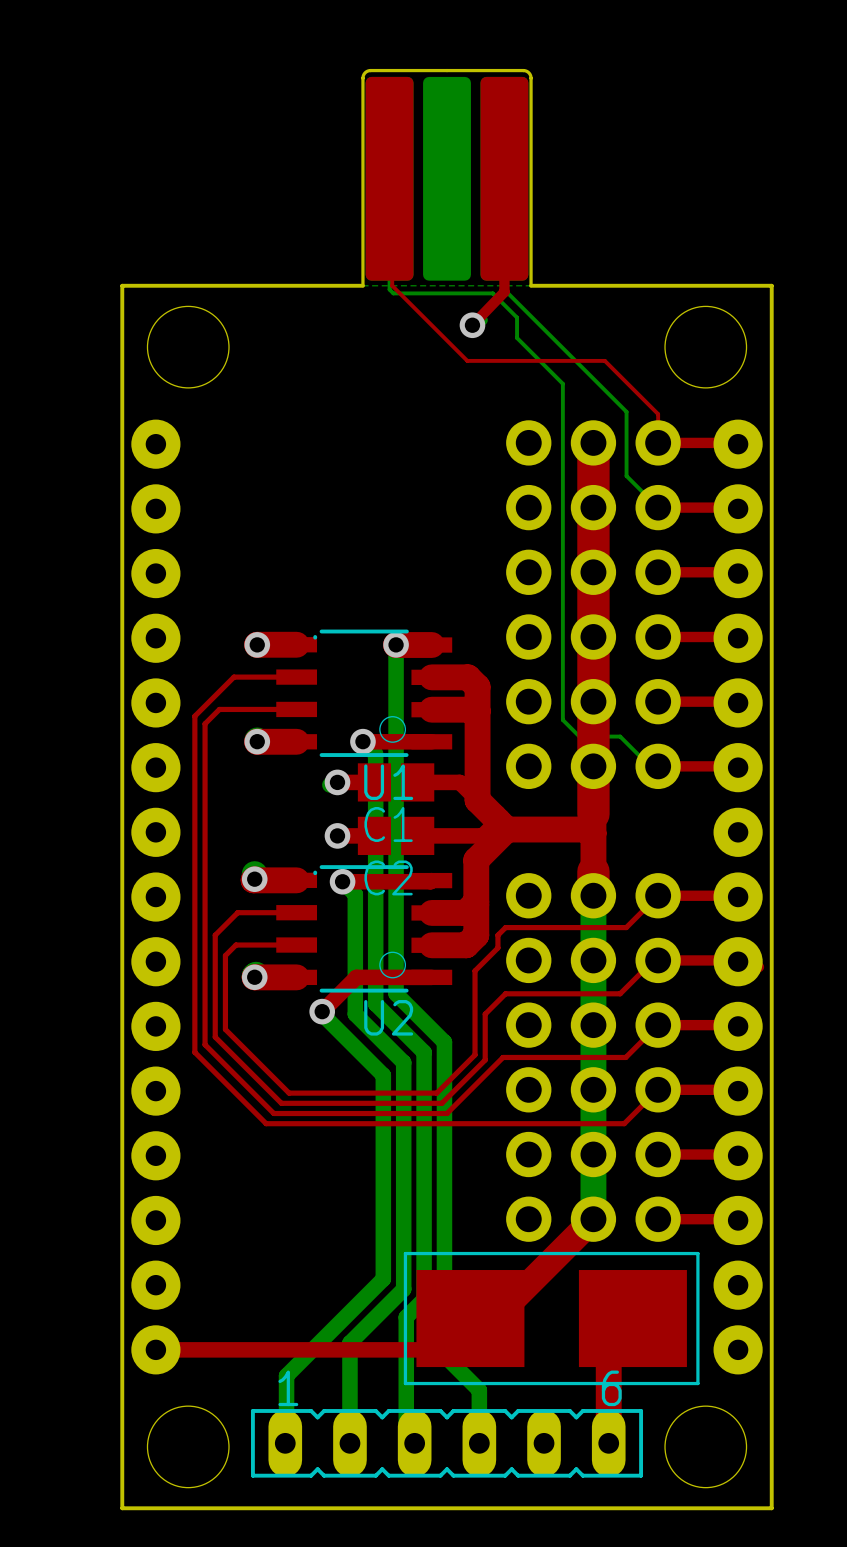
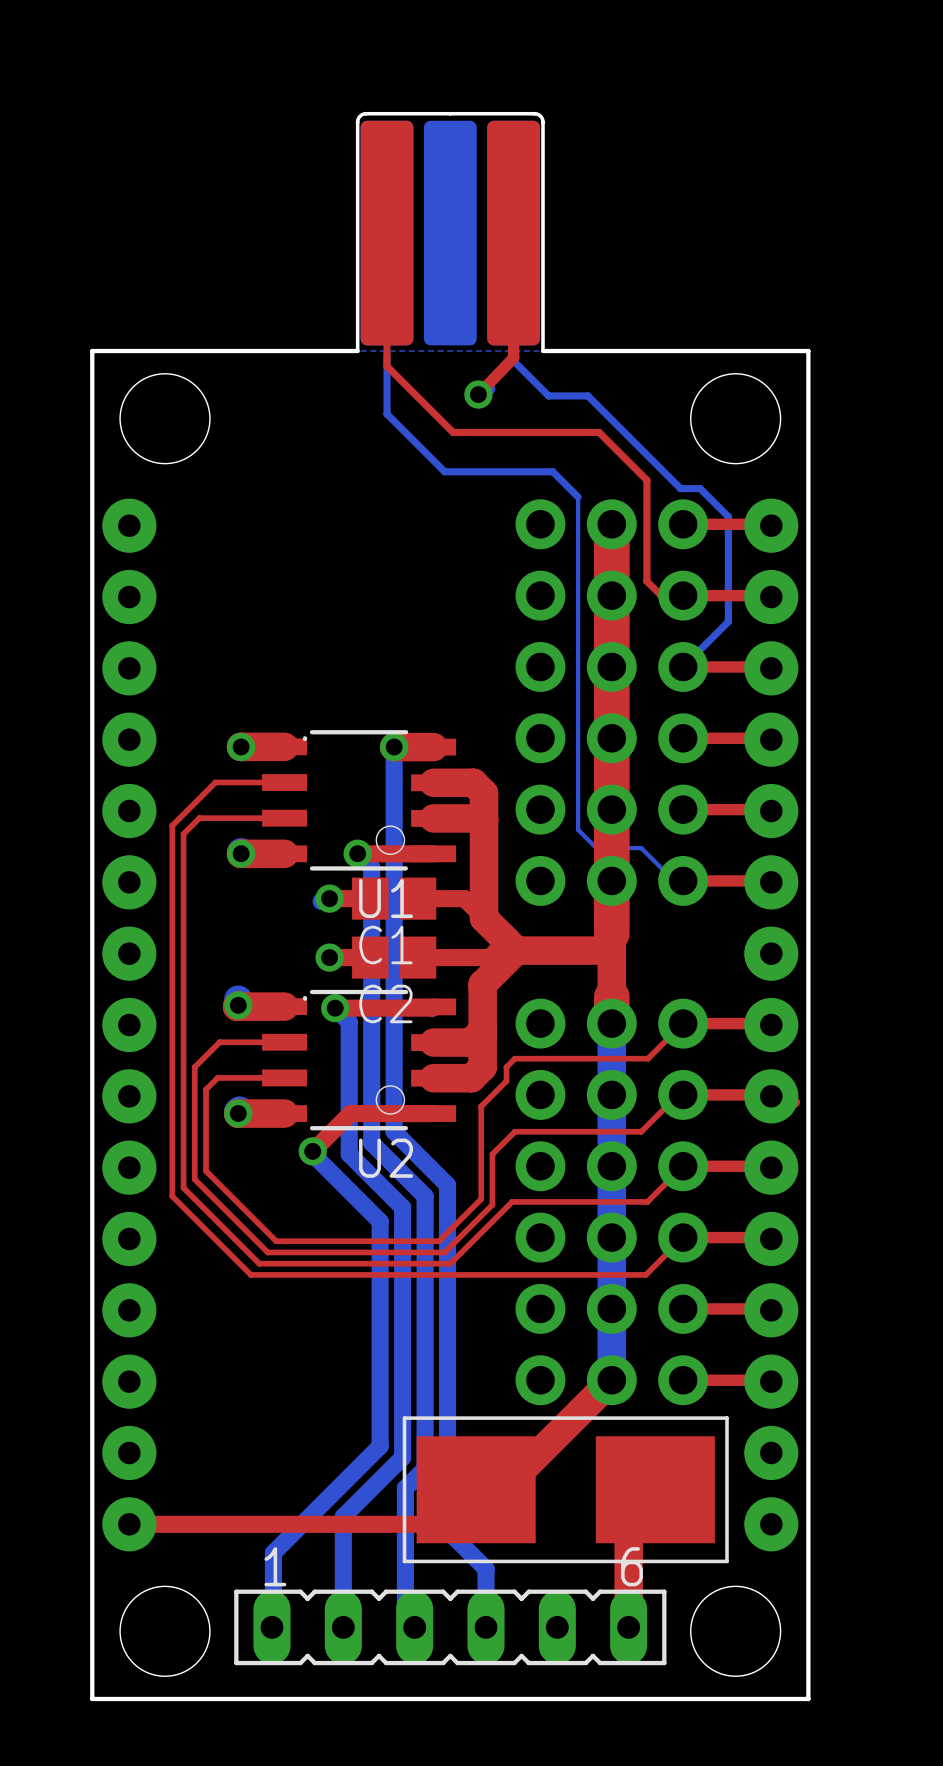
top track: (389, 199) (392, 201) (392, 285) (467, 360) (604, 360) (658, 414) (658, 442) -> (387, 255) (387, 366) (453, 432) (599, 432) (646, 480) (646, 581) (661, 595) (683, 595)
bottom track: (389, 289) (393, 293) (492, 293) (517, 317) (517, 337) (562, 383) (562, 418) -> (387, 355) (387, 414) (444, 471) (552, 471) (578, 497)
bottom track: (504, 289) (626, 411) (626, 476) (658, 507) -> (513, 355) (513, 360) (548, 395) (587, 395) (680, 488) (700, 488) (728, 516) (728, 621) (683, 666)

